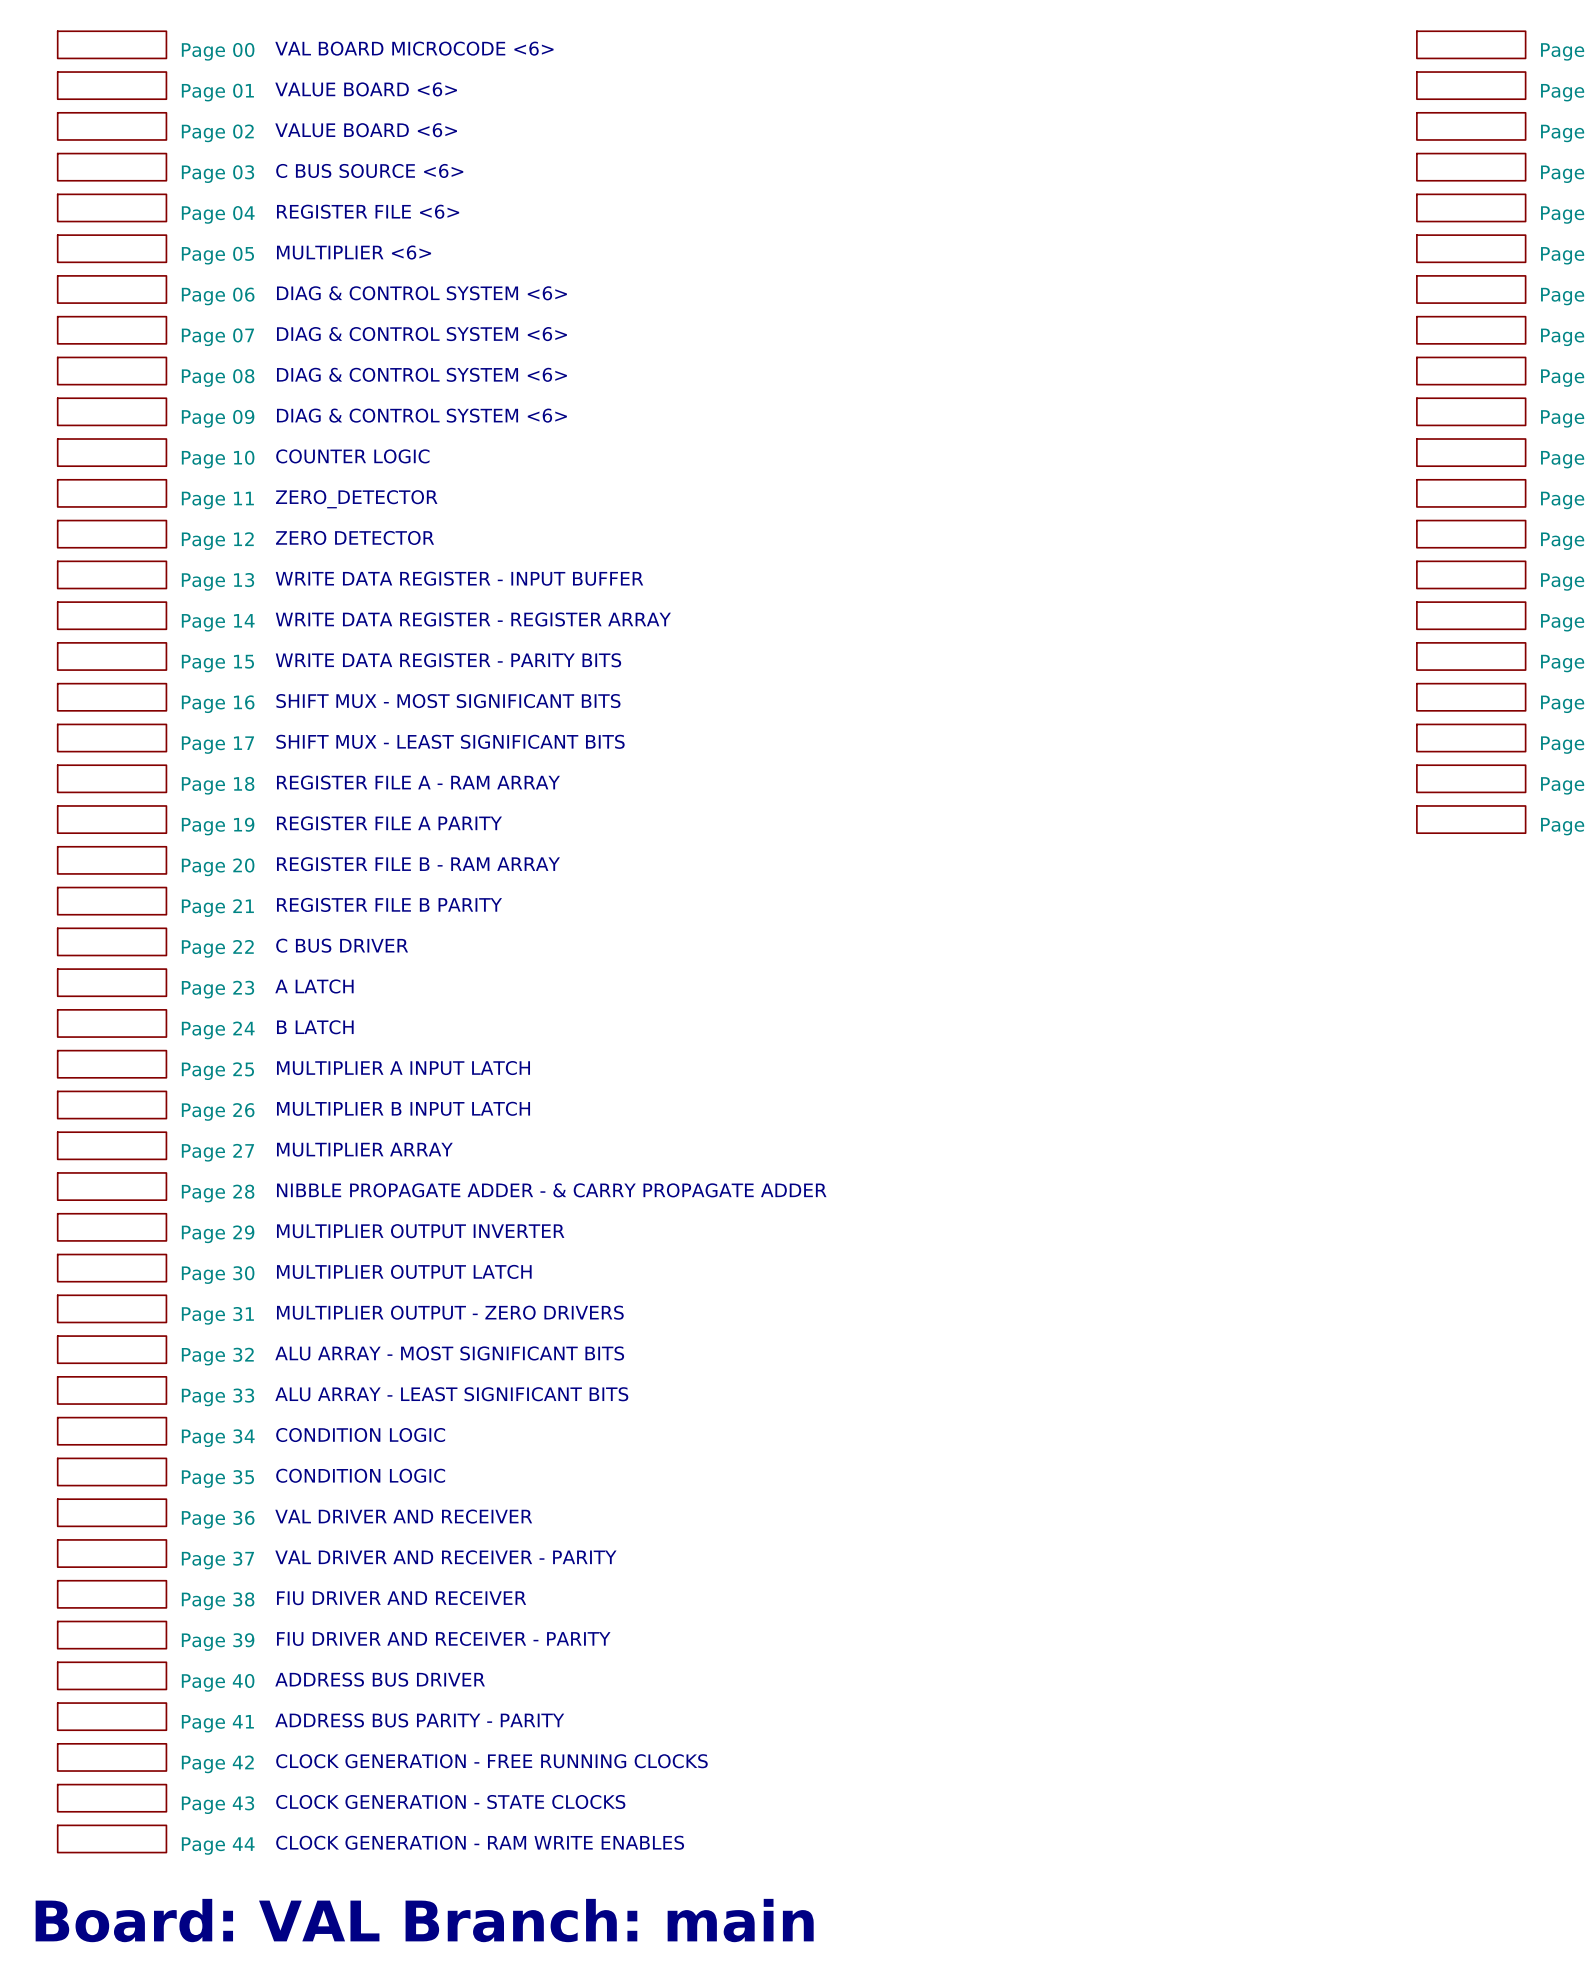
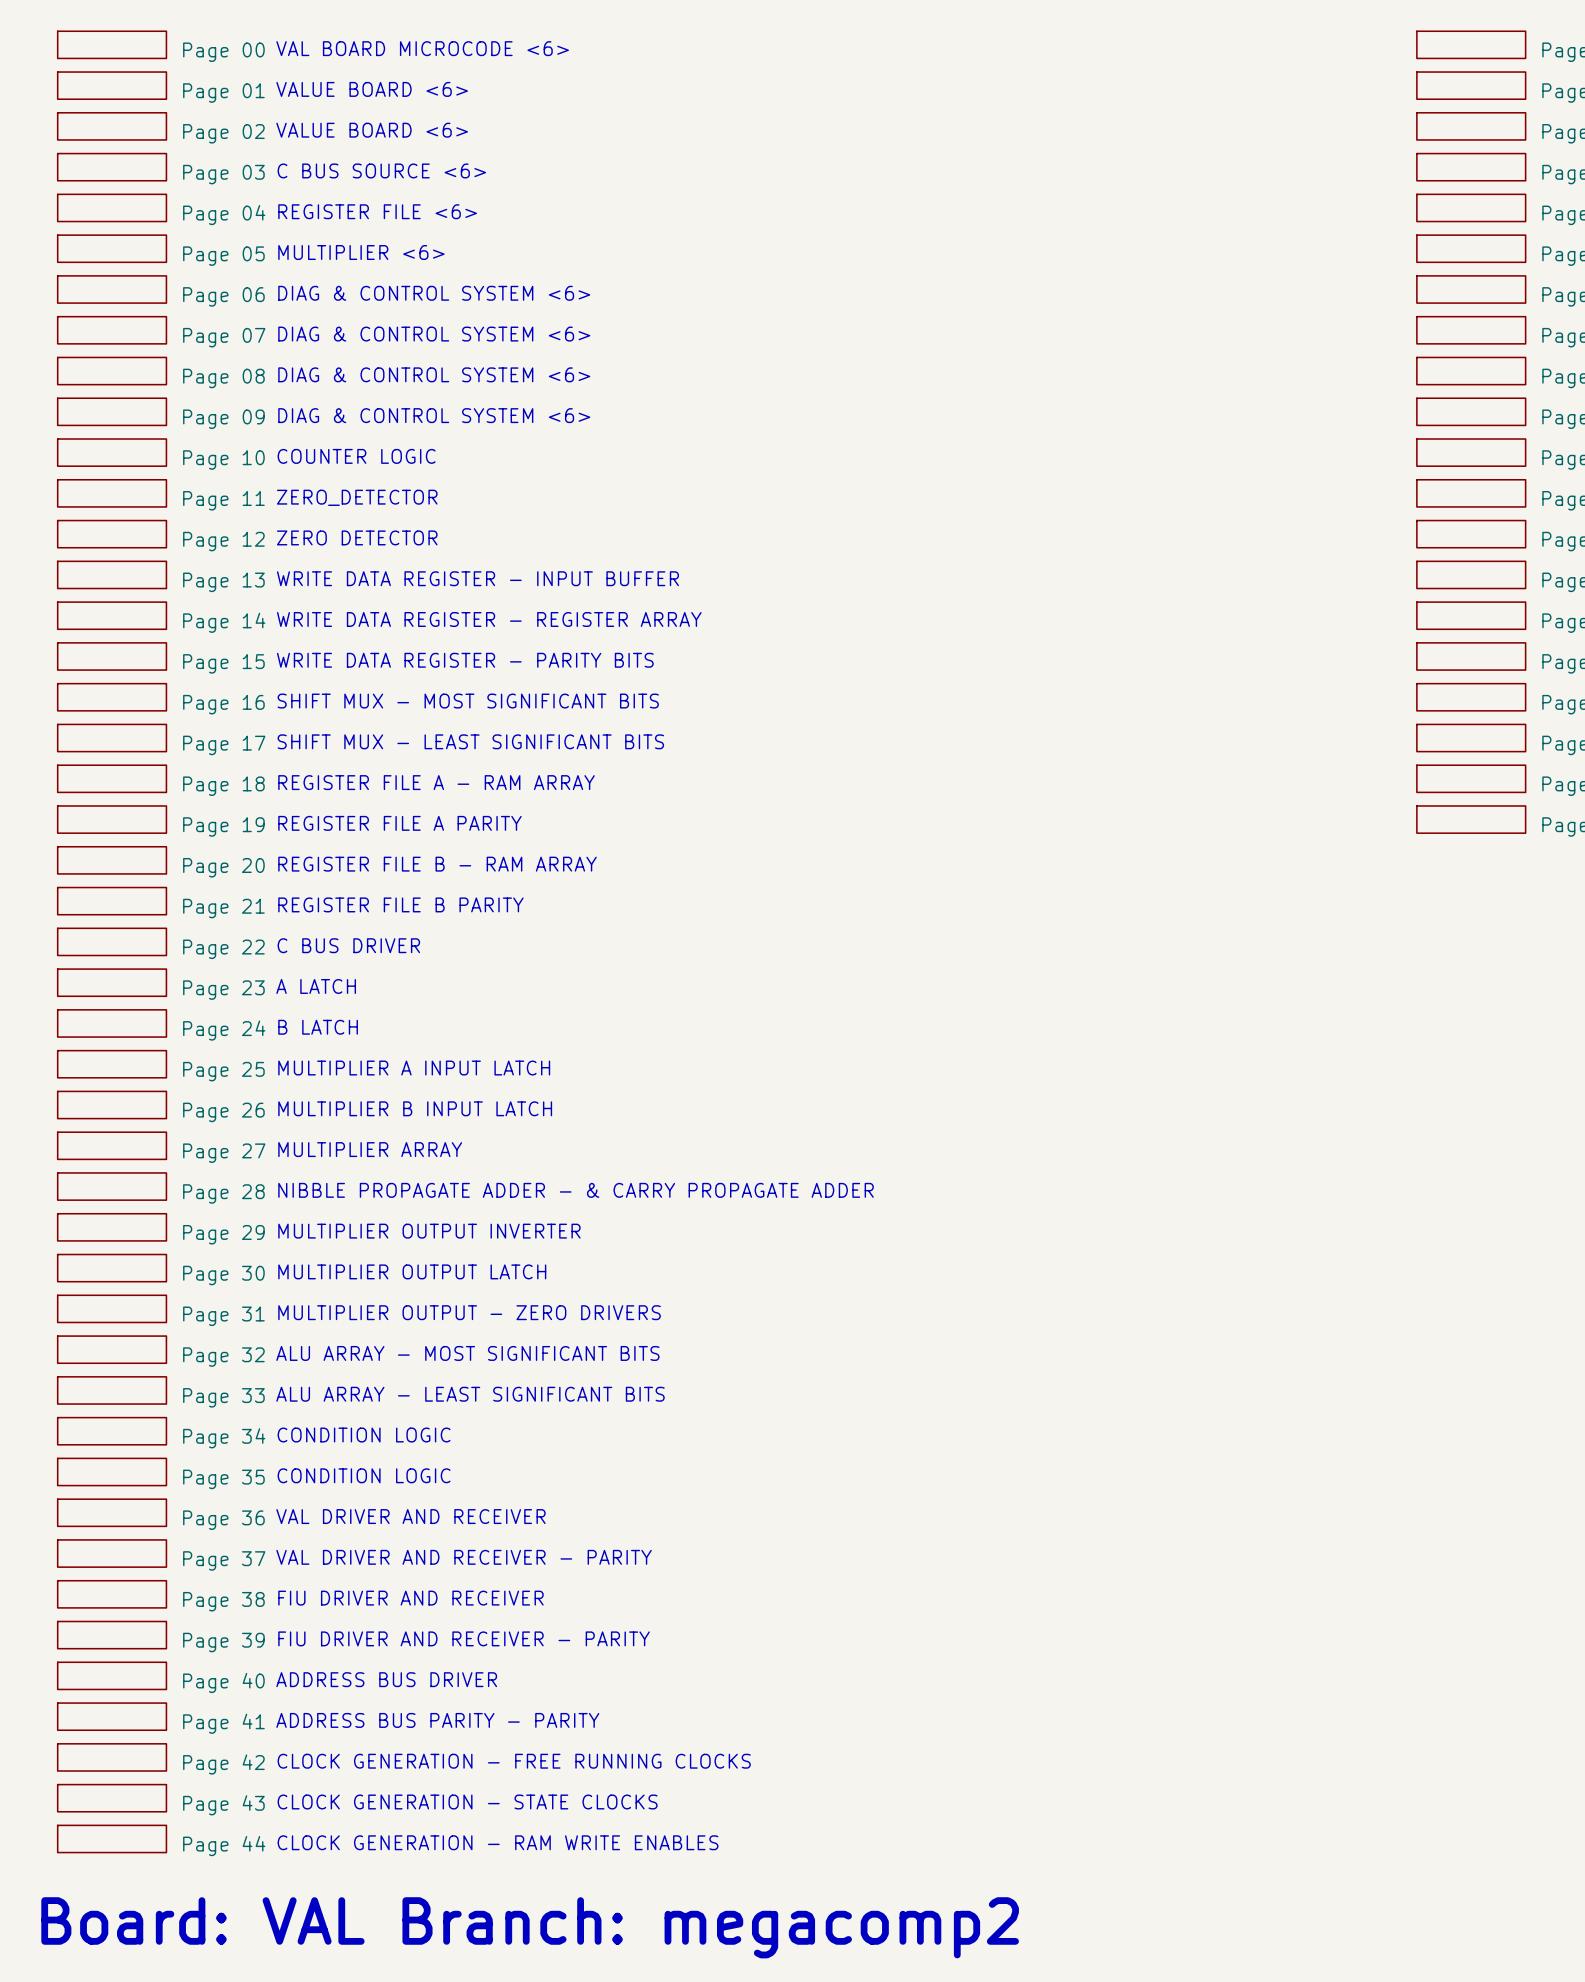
text: Board: VAL Branch: main (424, 1920) -> Board: VAL Branch: megacomp2 (530, 1927)

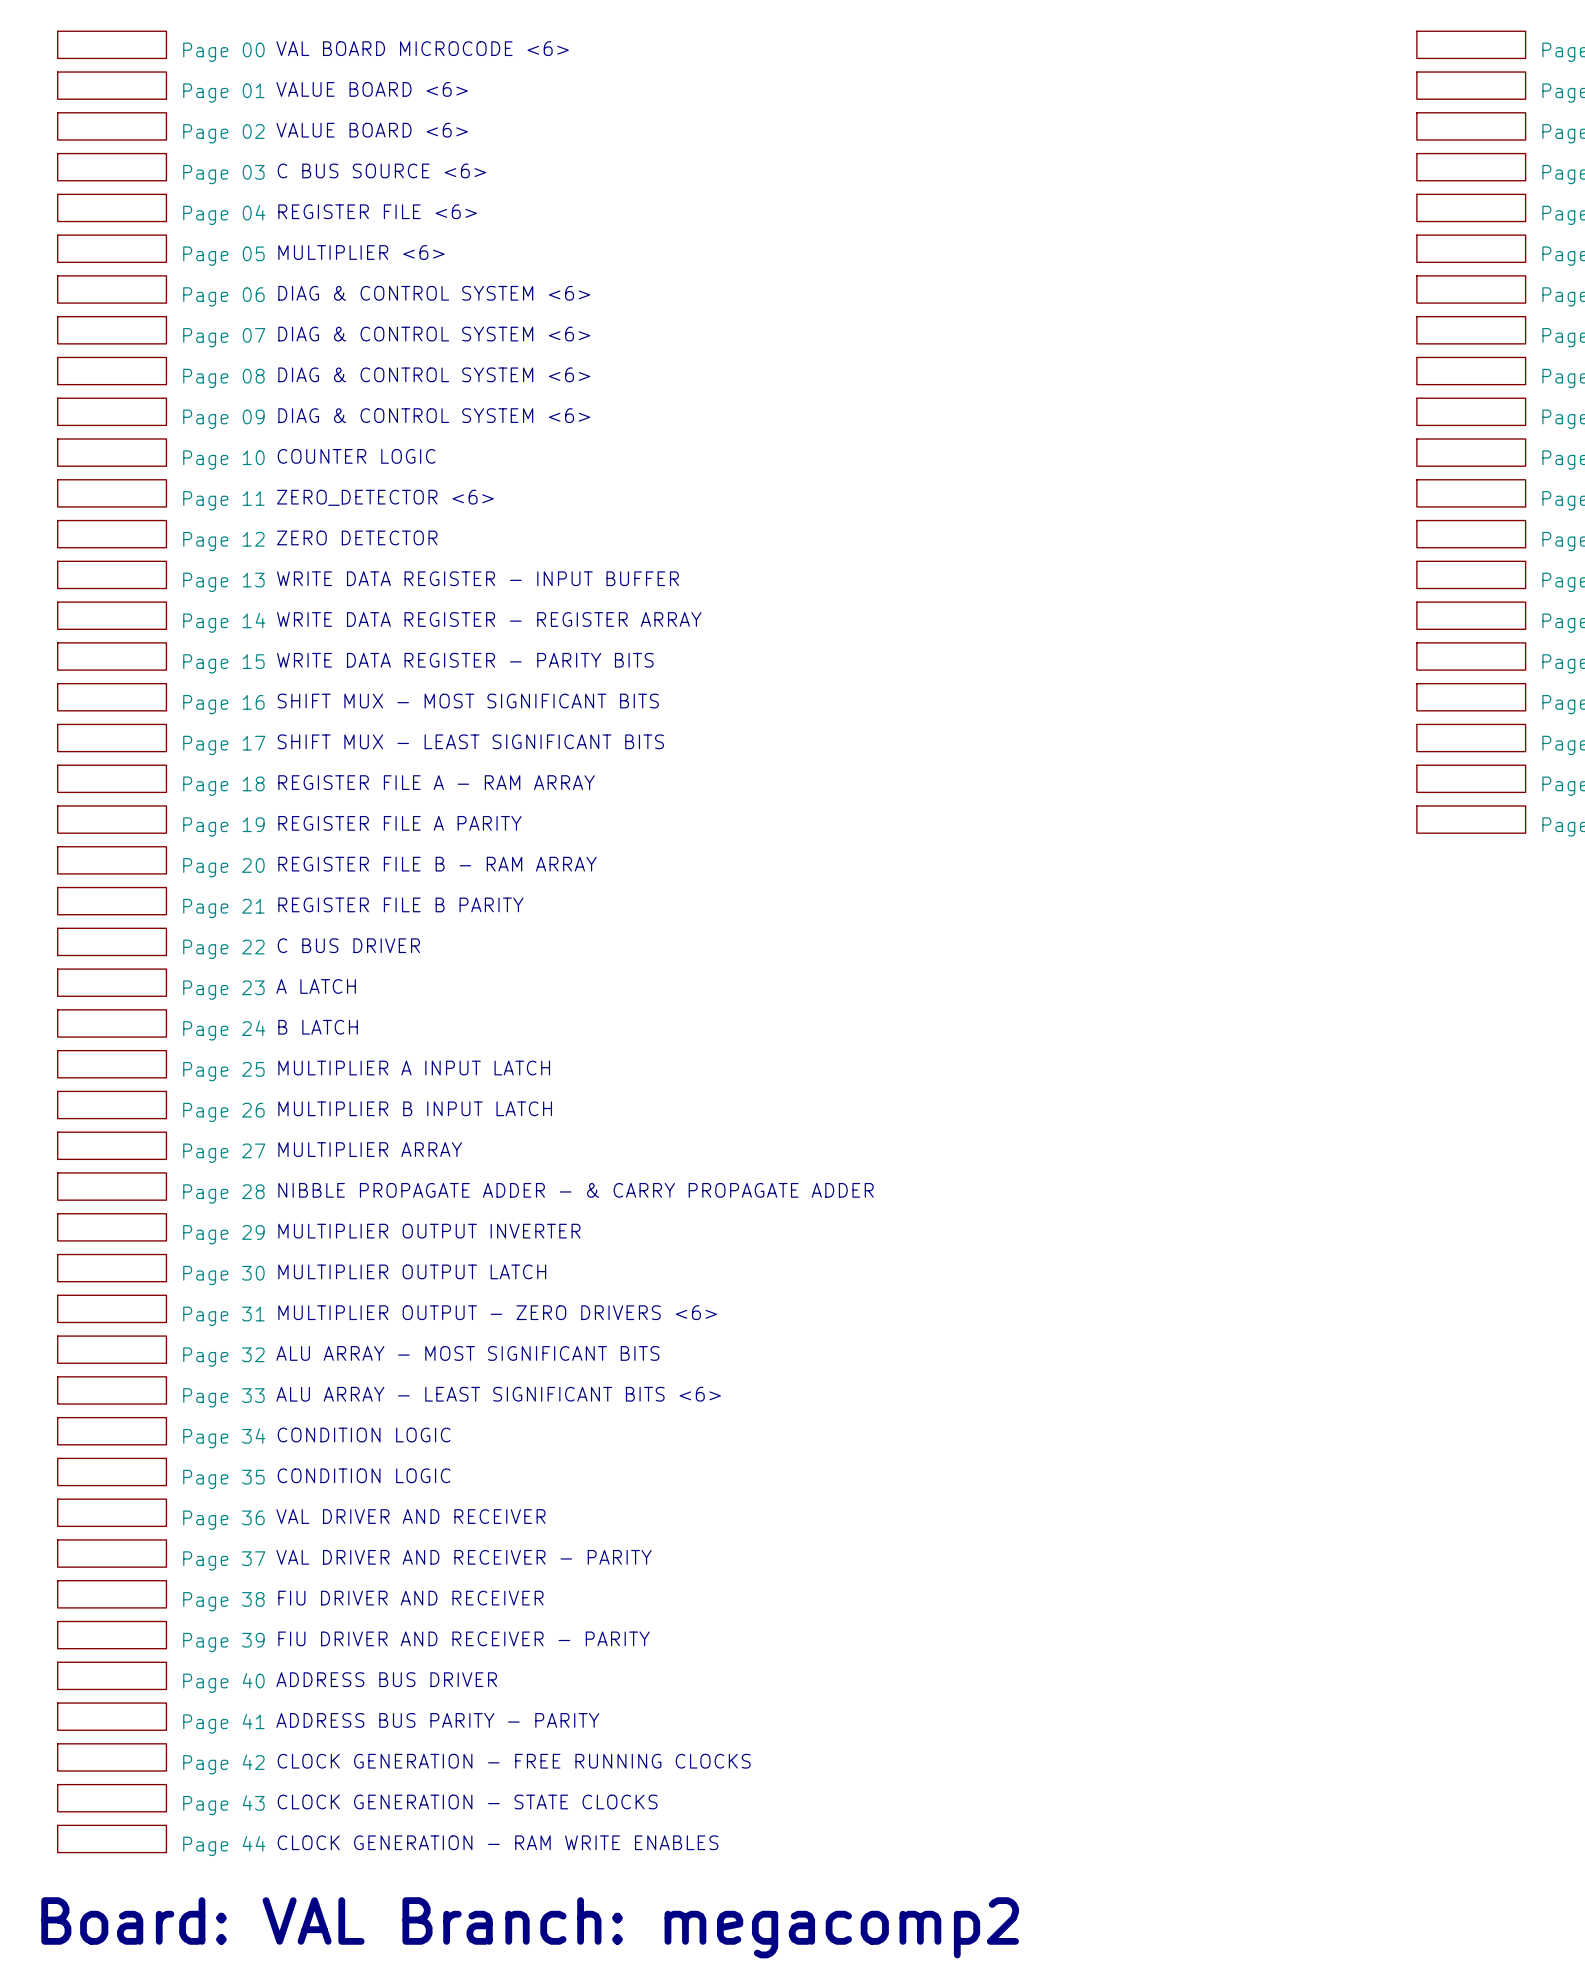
text: ZERO_DETECTOR (357, 497) -> ZERO_DETECTOR <6> (385, 497)
text: MULTIPLIER OUTPUT - ZERO DRIVERS (469, 1312) -> MULTIPLIER OUTPUT - ZERO DRIVERS <6> (497, 1312)
text: ALU ARRAY - LEAST SIGNIFICANT BITS (470, 1394) -> ALU ARRAY - LEAST SIGNIFICANT BITS <6> (498, 1394)

